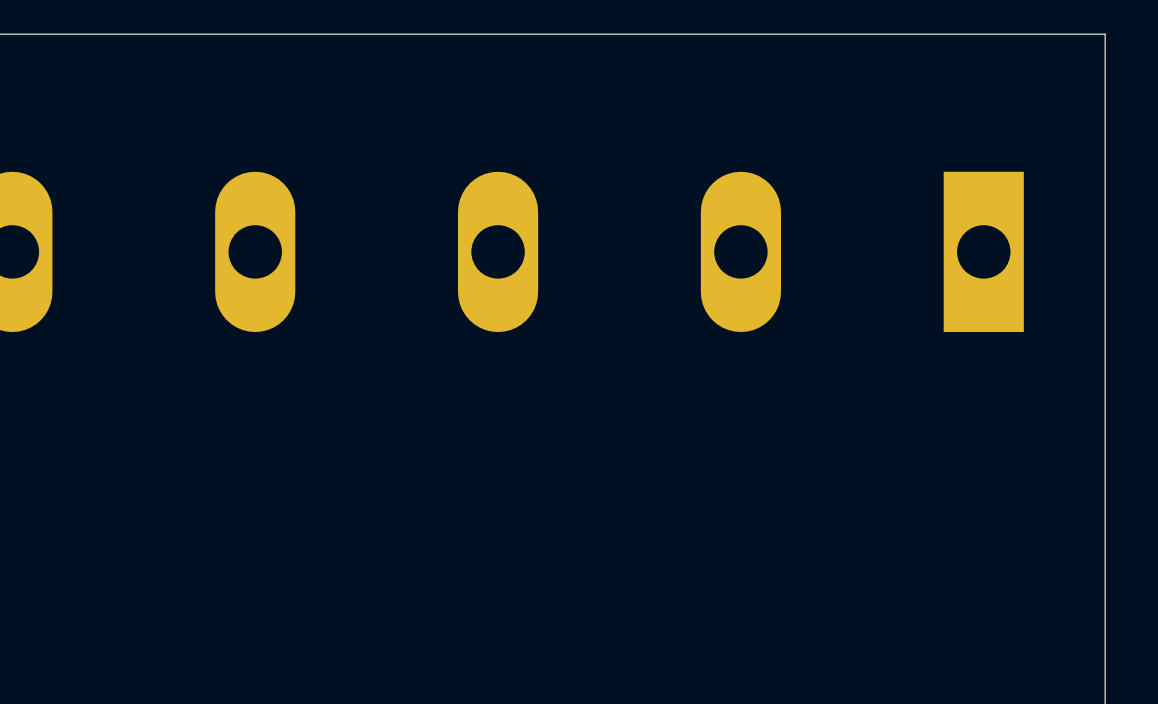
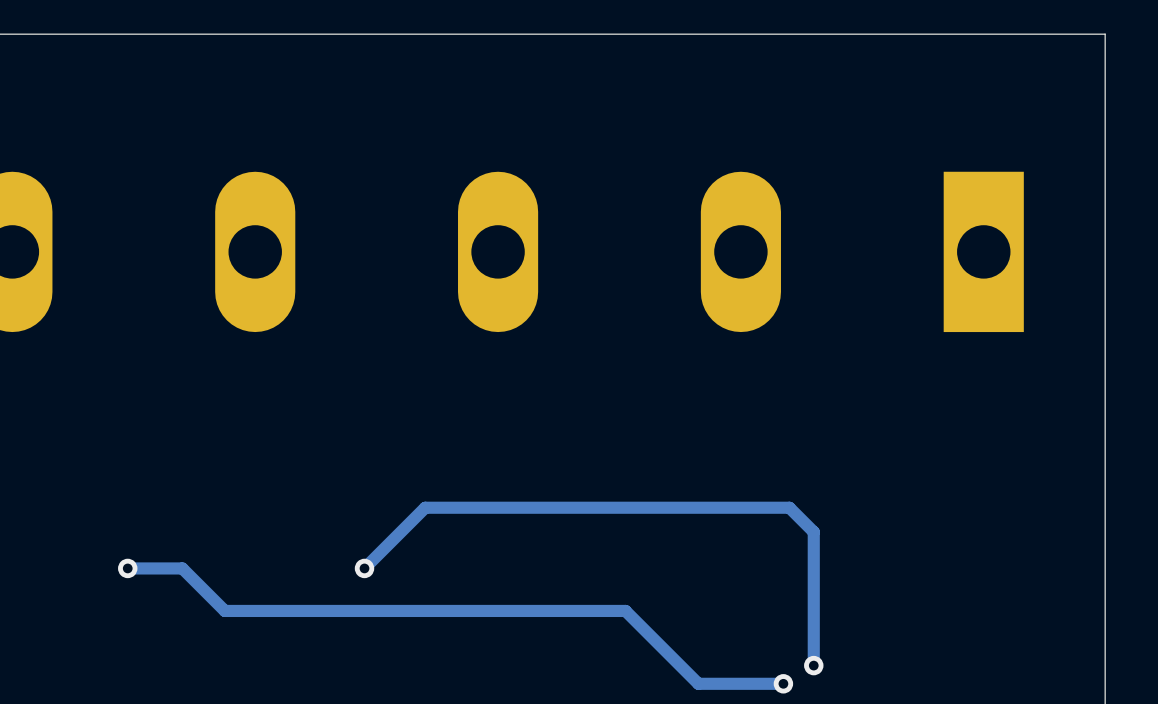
track: none -> (127, 568) (182, 568) (224, 610) (625, 610) (698, 683) (783, 683)
via: none -> (127, 568)
track: none -> (364, 568) (425, 507) (789, 507) (813, 532) (813, 665)
via: none -> (364, 568)
via: none -> (813, 665)
via: none -> (783, 683)

